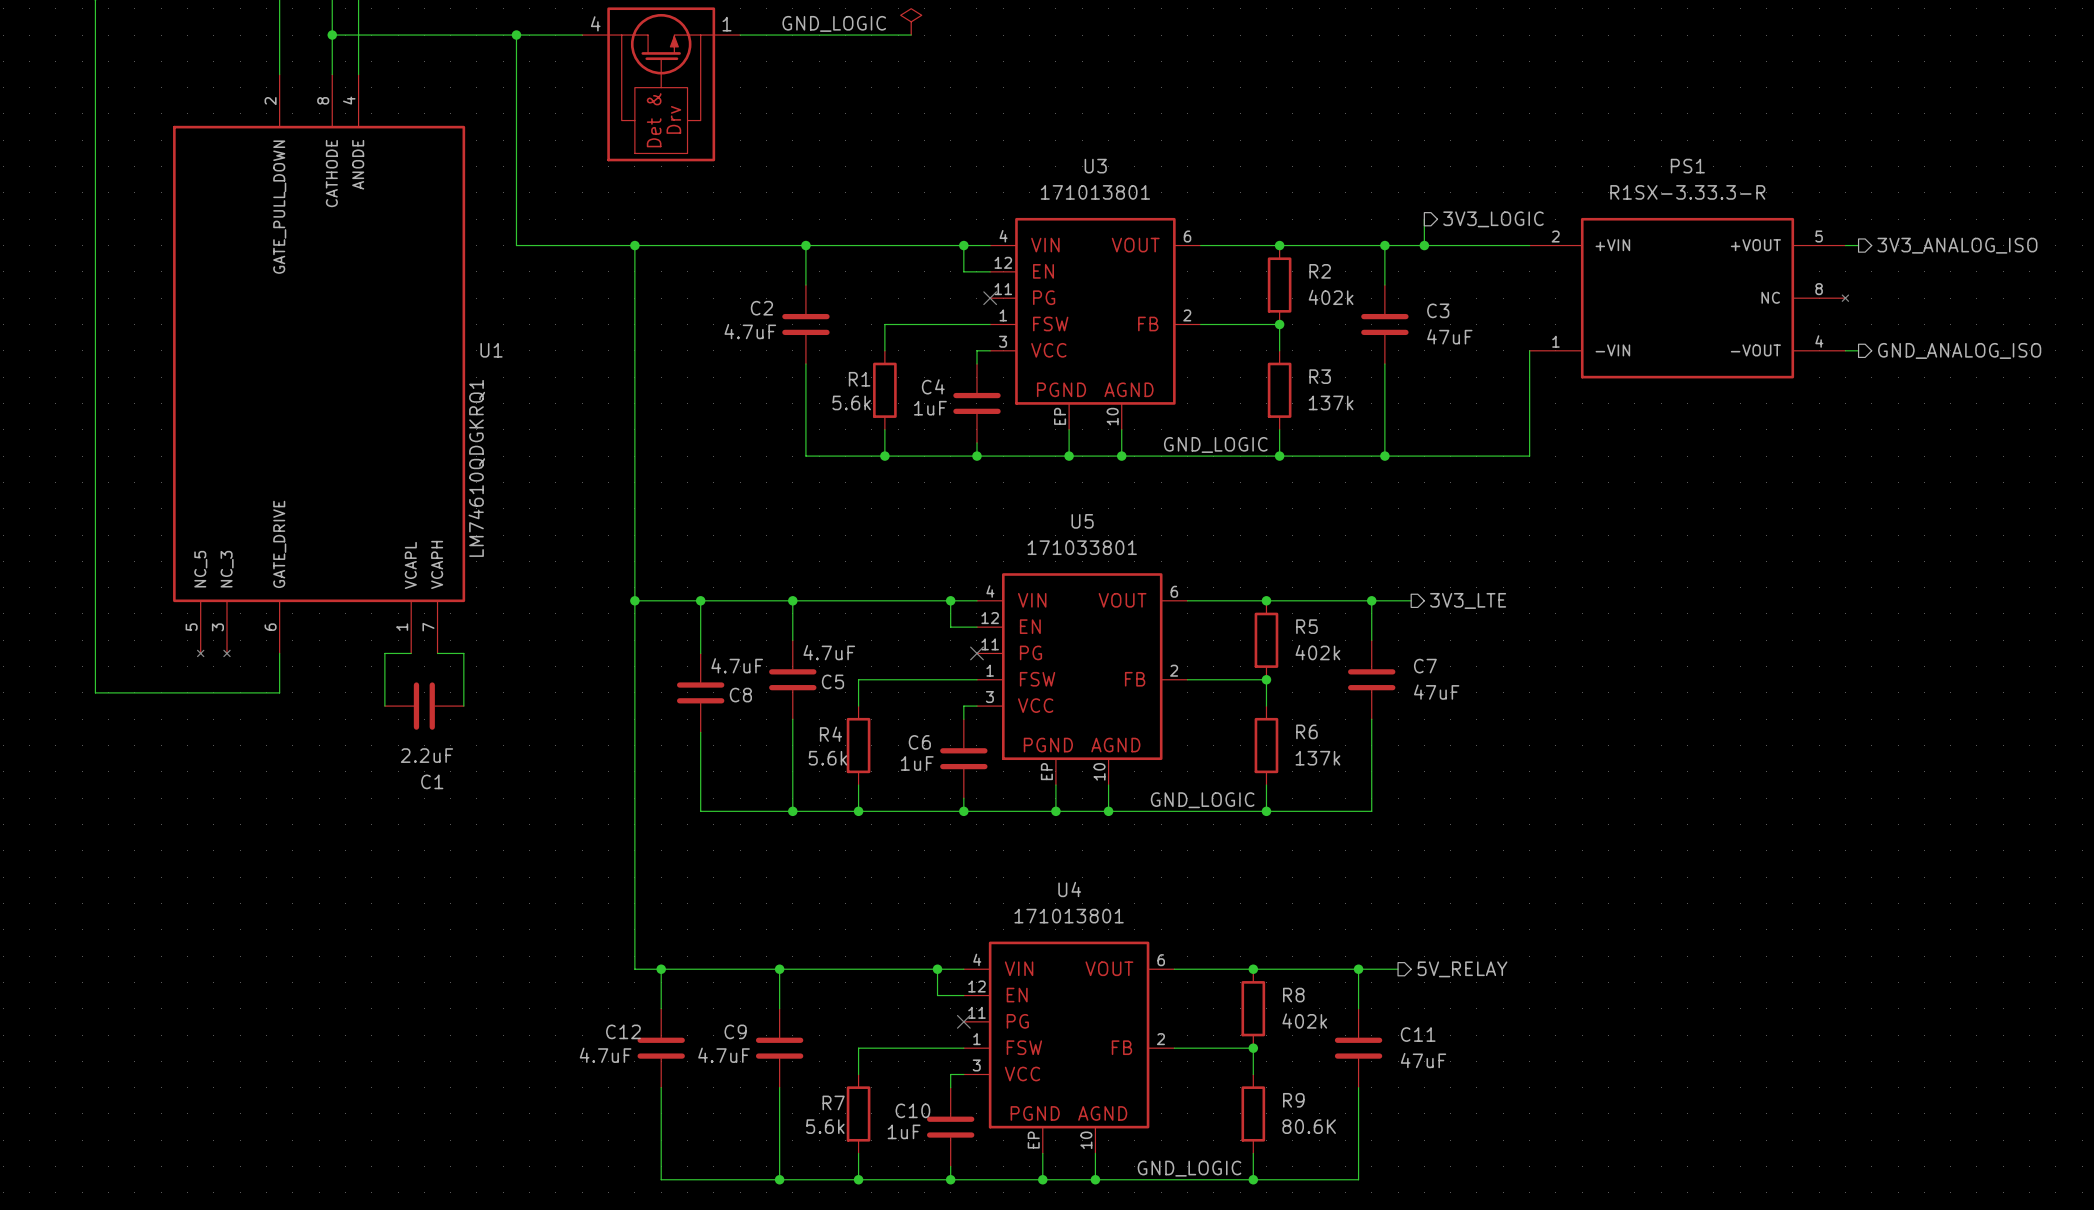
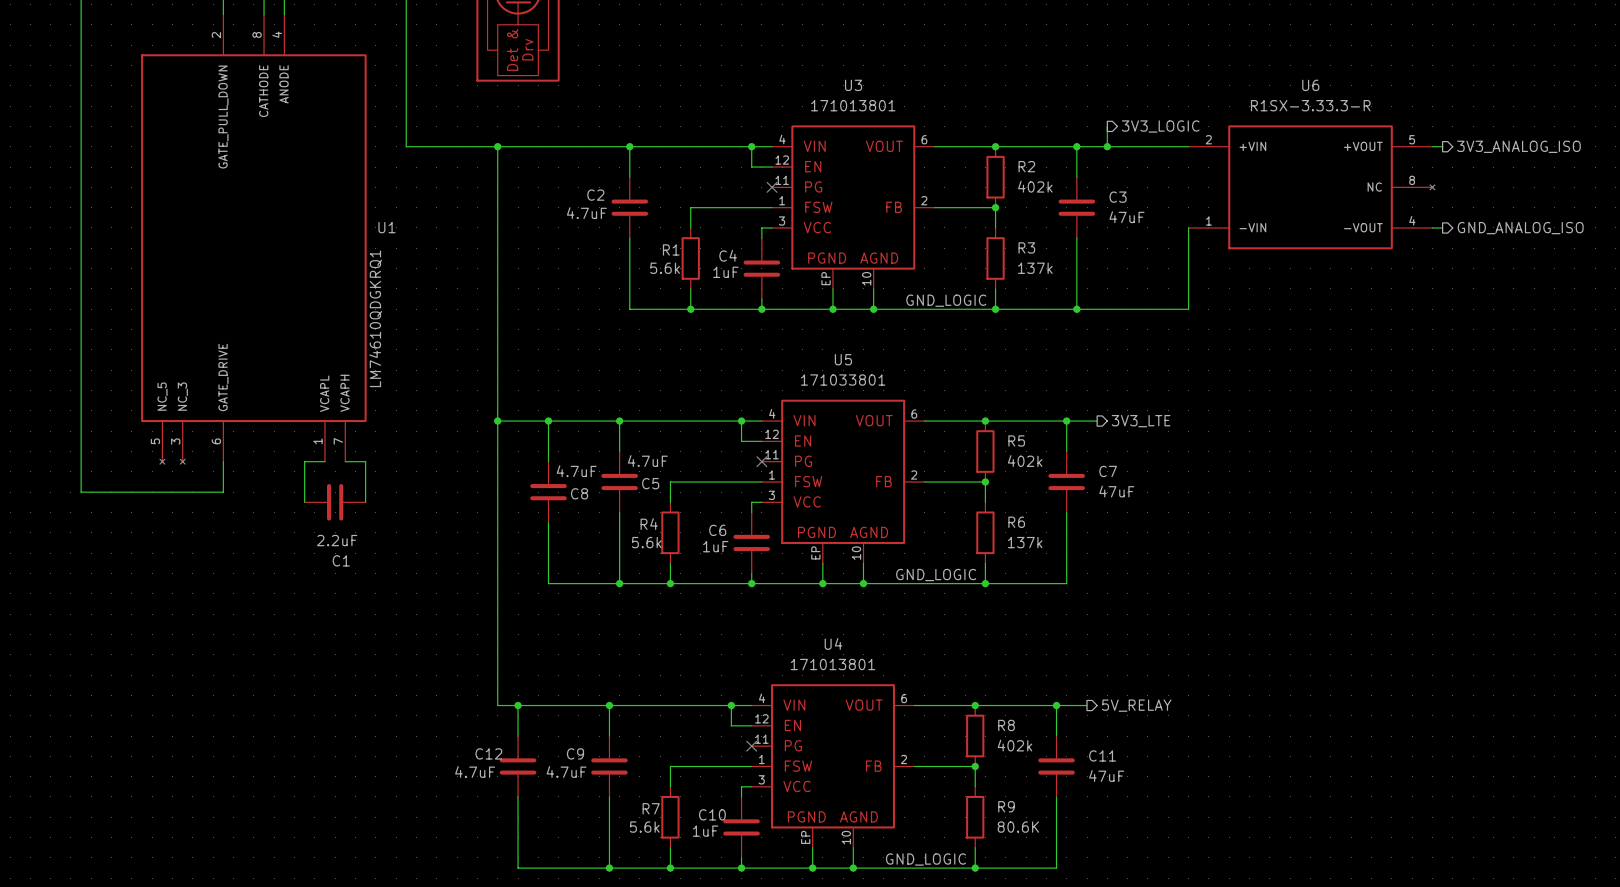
PS1 name: PS1 (1687, 166) -> U6 (1310, 85)

